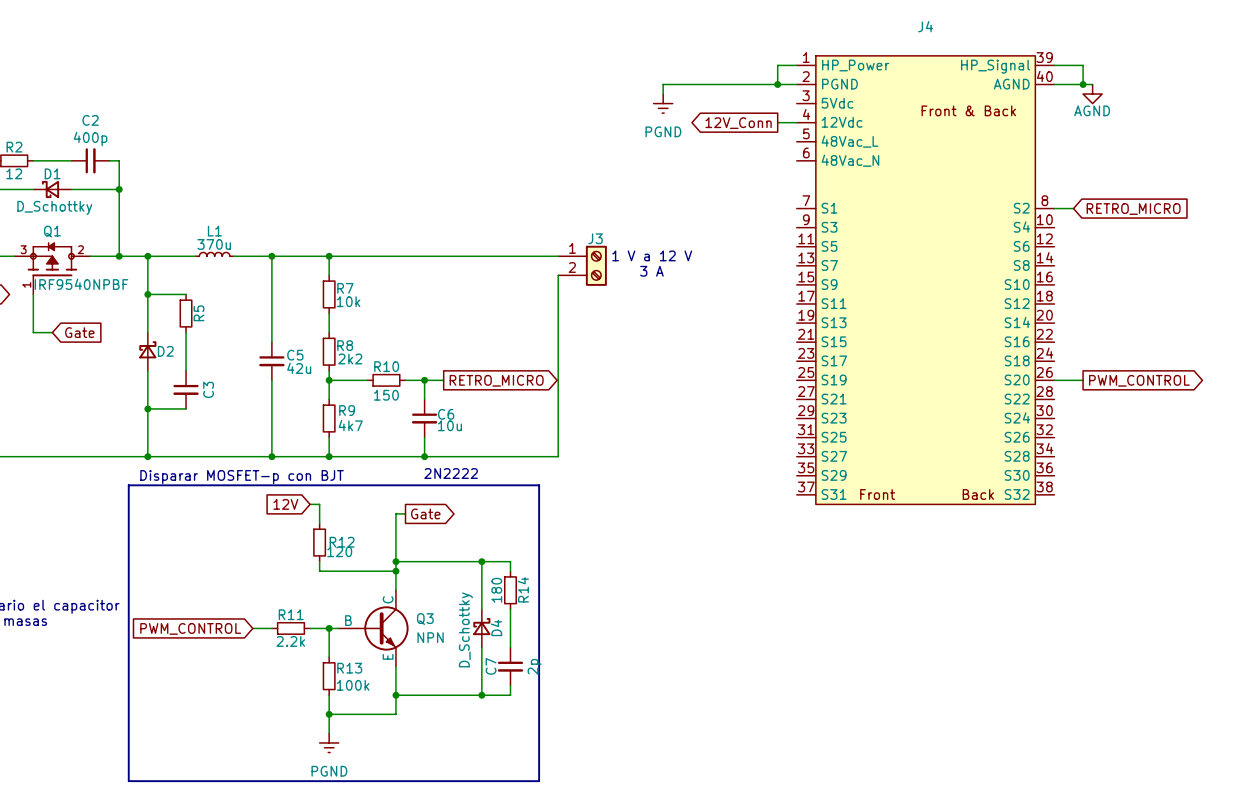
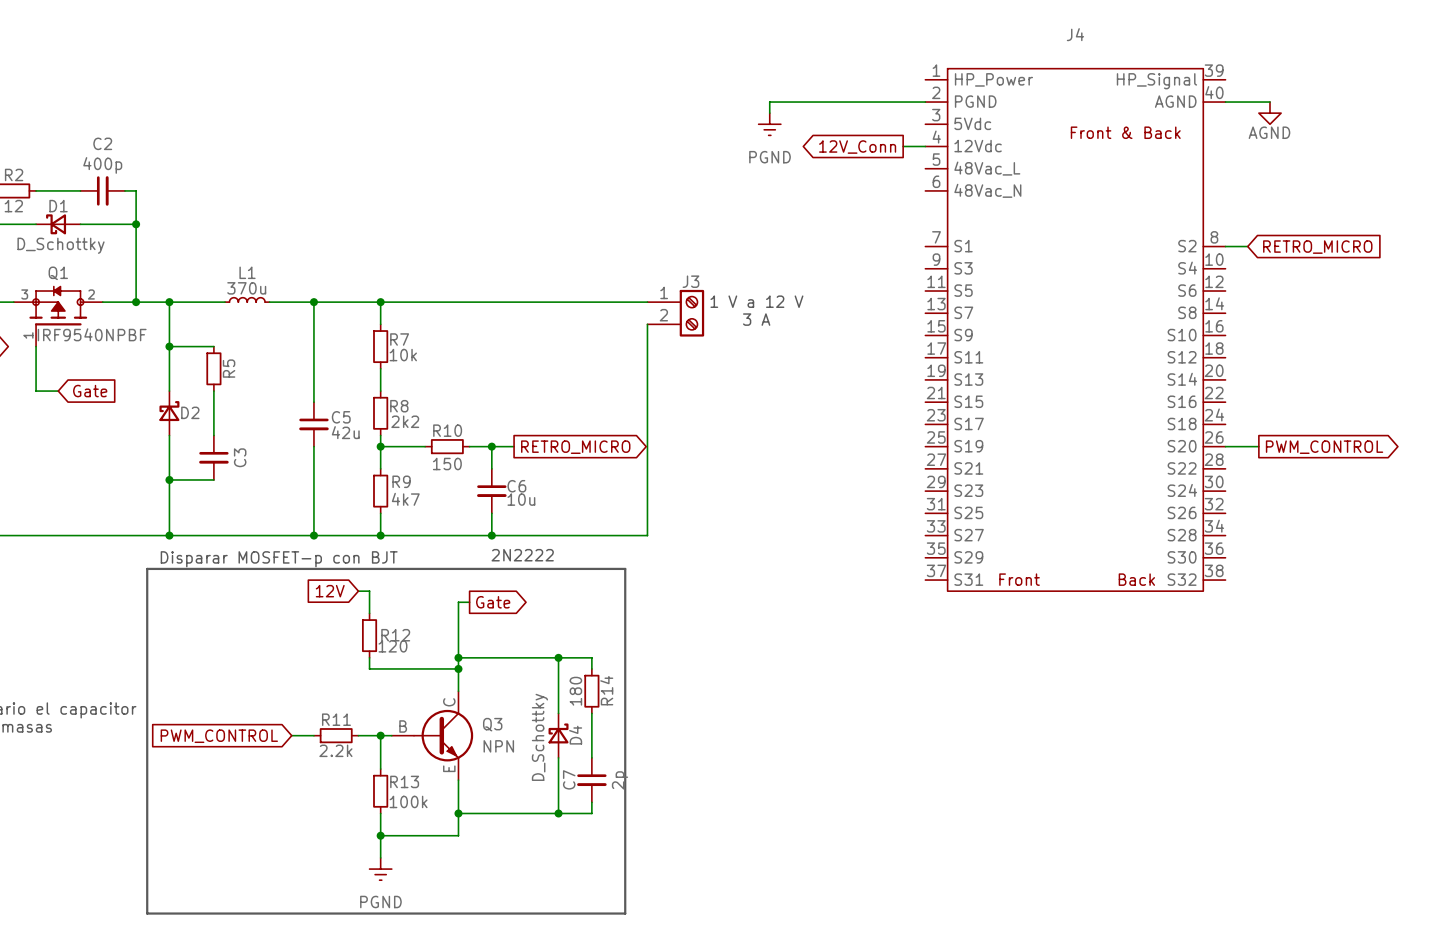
wire: (796, 65) (777, 65) (777, 84) -> none
wire: (1054, 65) (1083, 65) (1083, 84) -> none
junction: (777, 84) -> none
junction: (1083, 84) -> none

